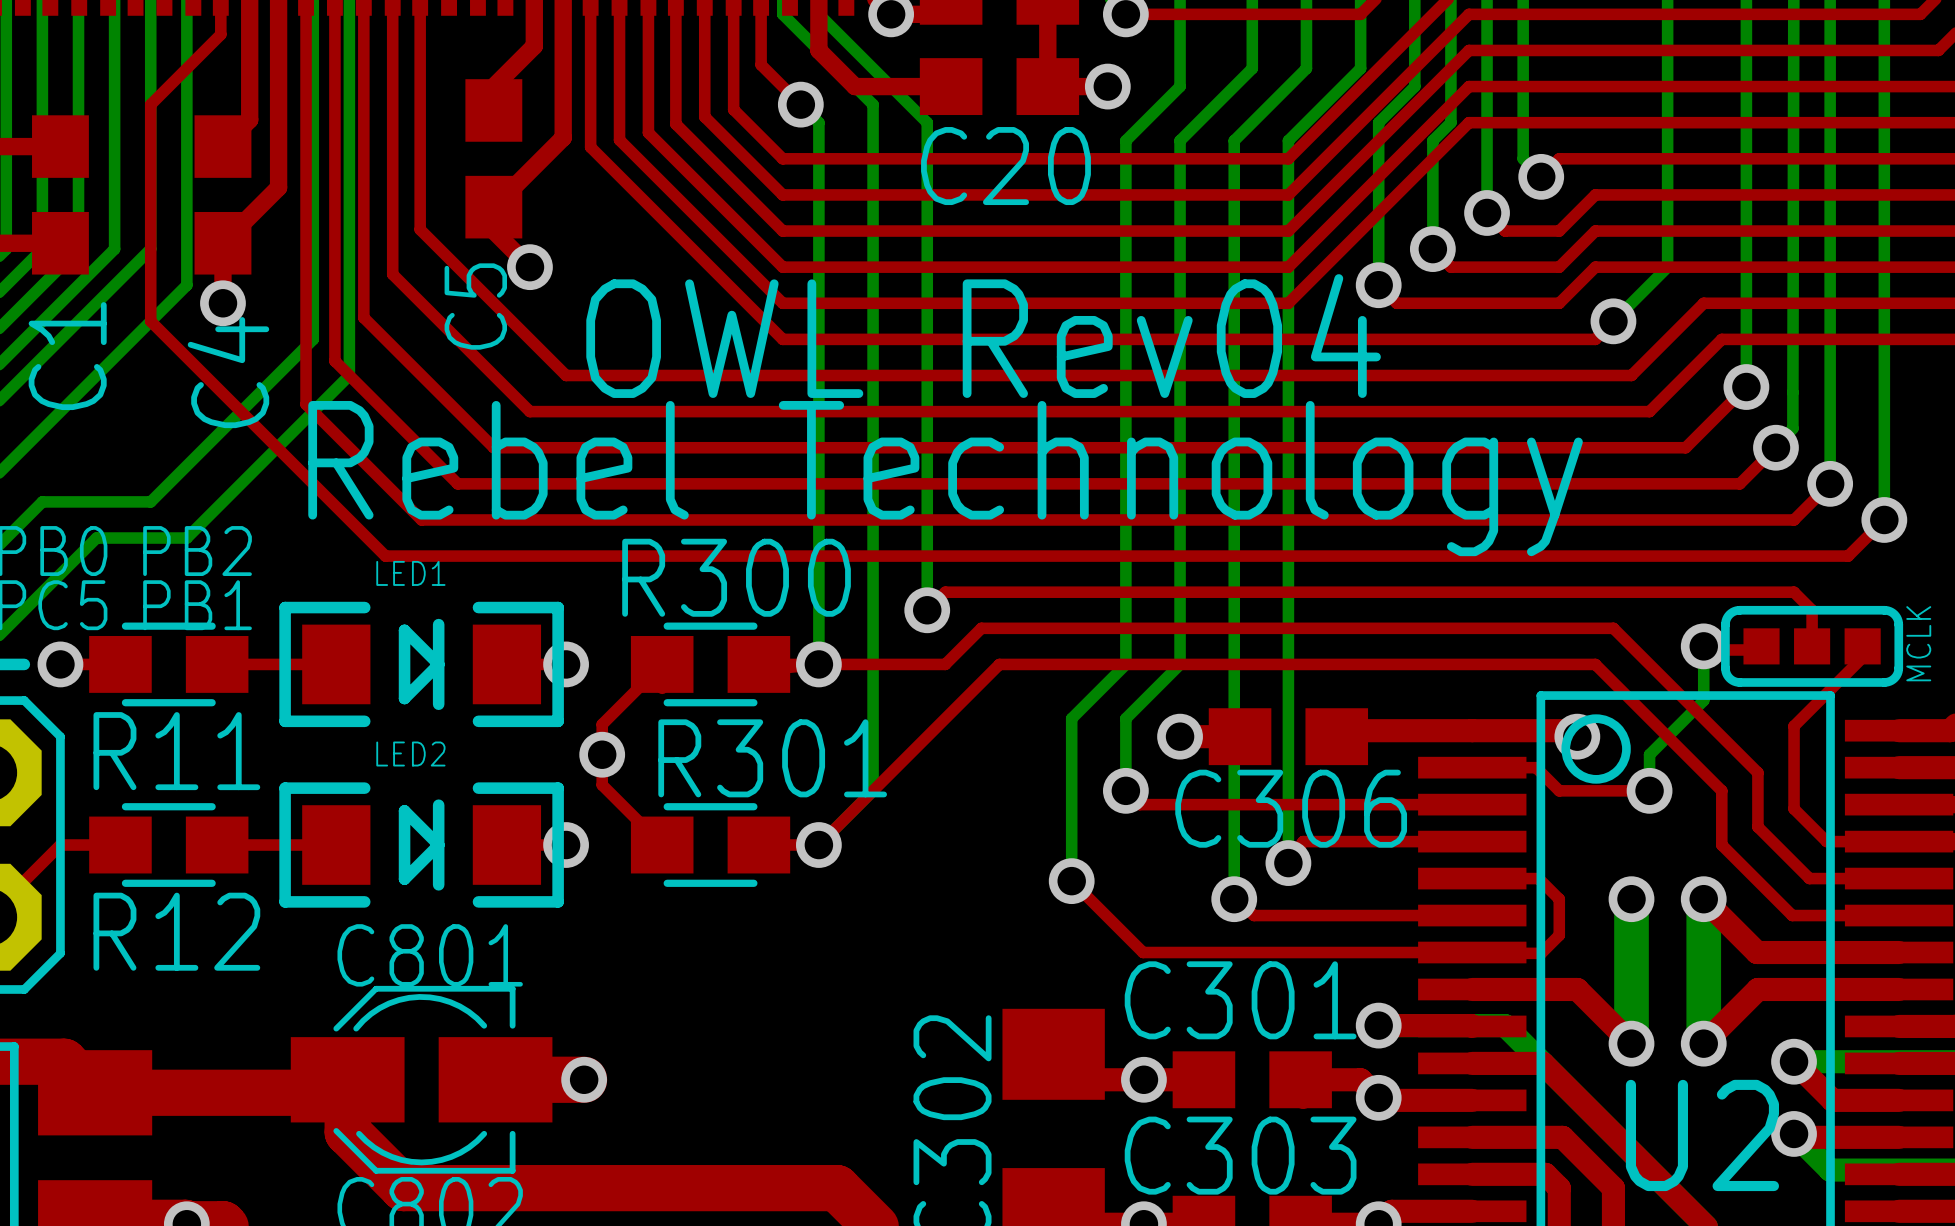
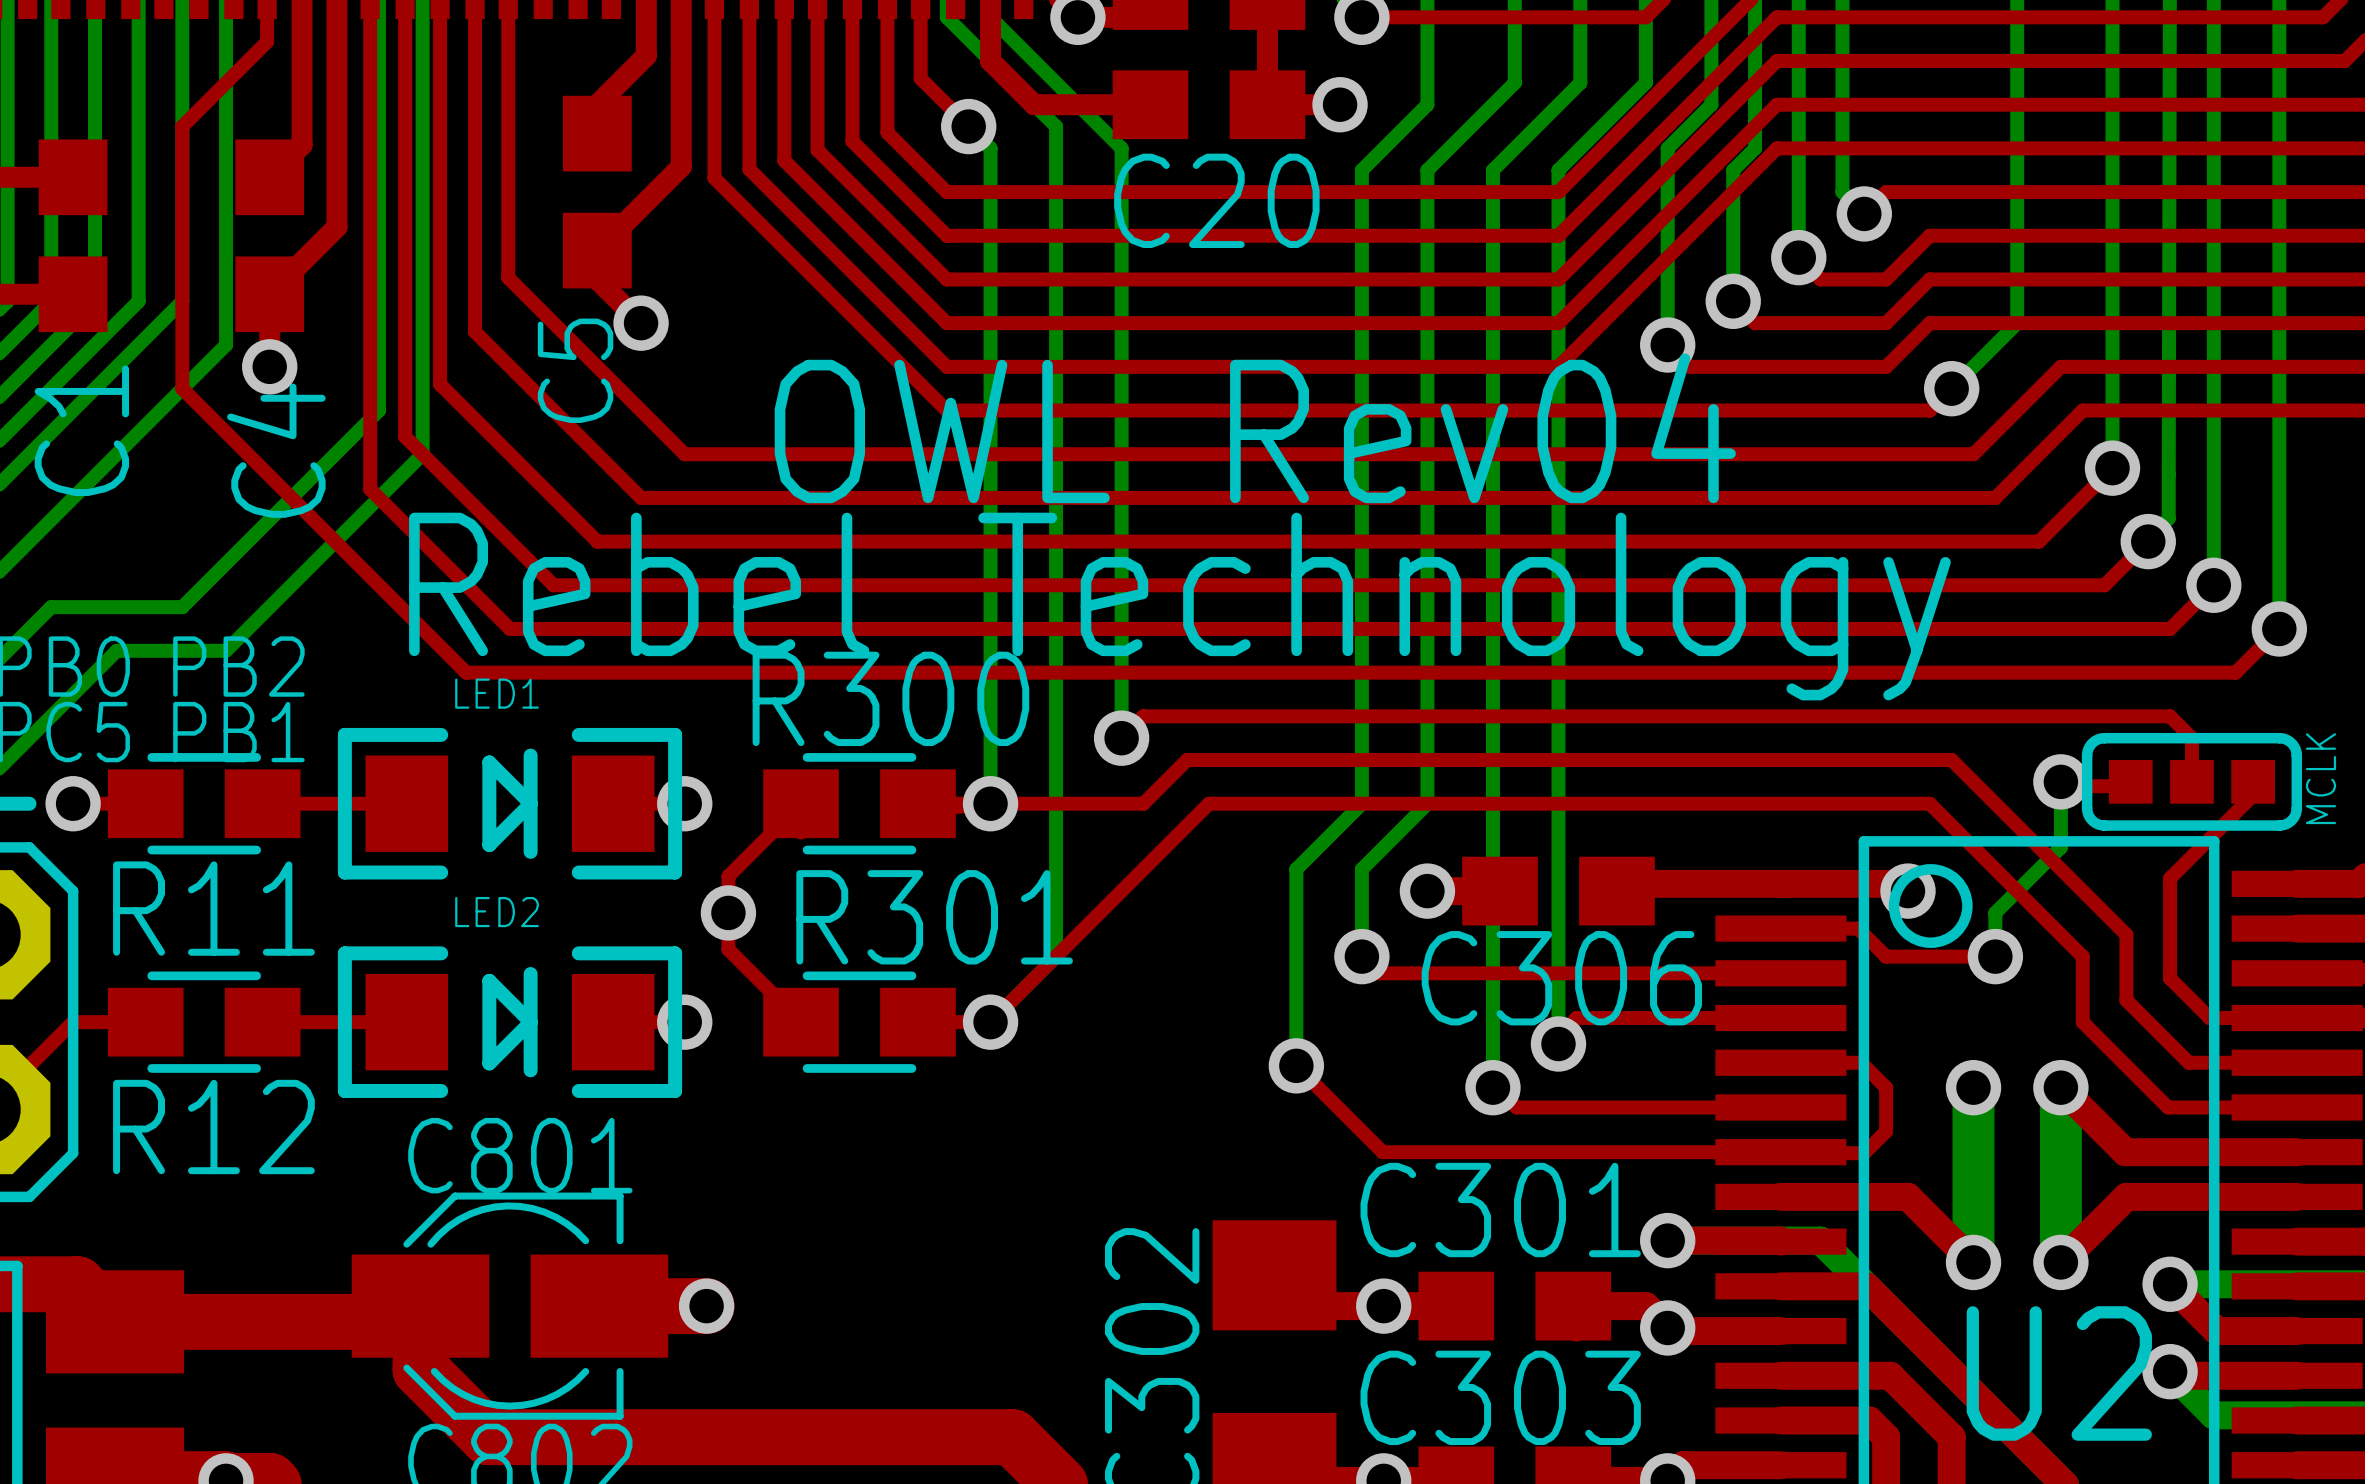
text position: OWL Rev04 (983, 336) -> OWL Rev04 (1255, 428)
text position: Rebel Technology (945, 478) -> Rebel Technology (1179, 606)

